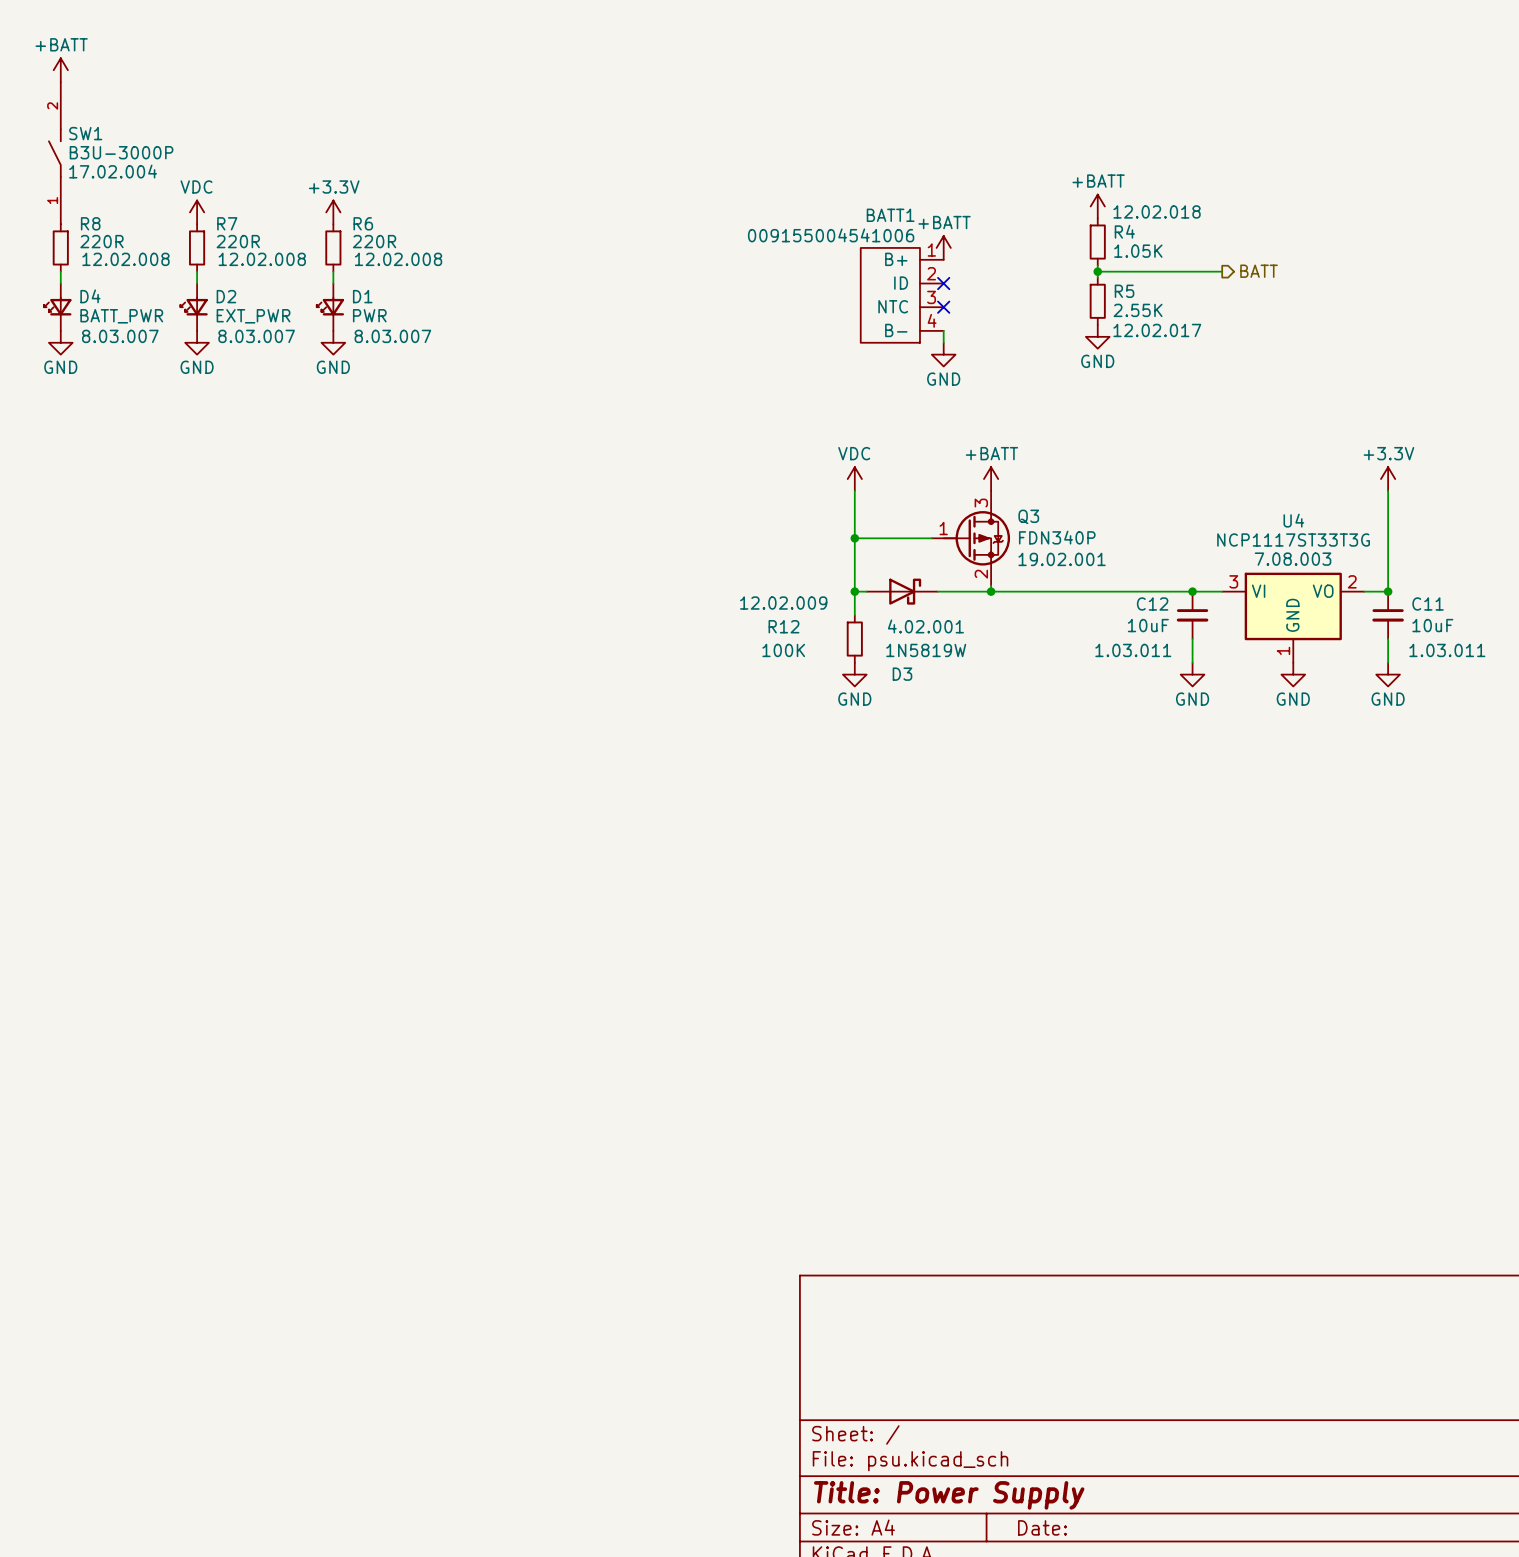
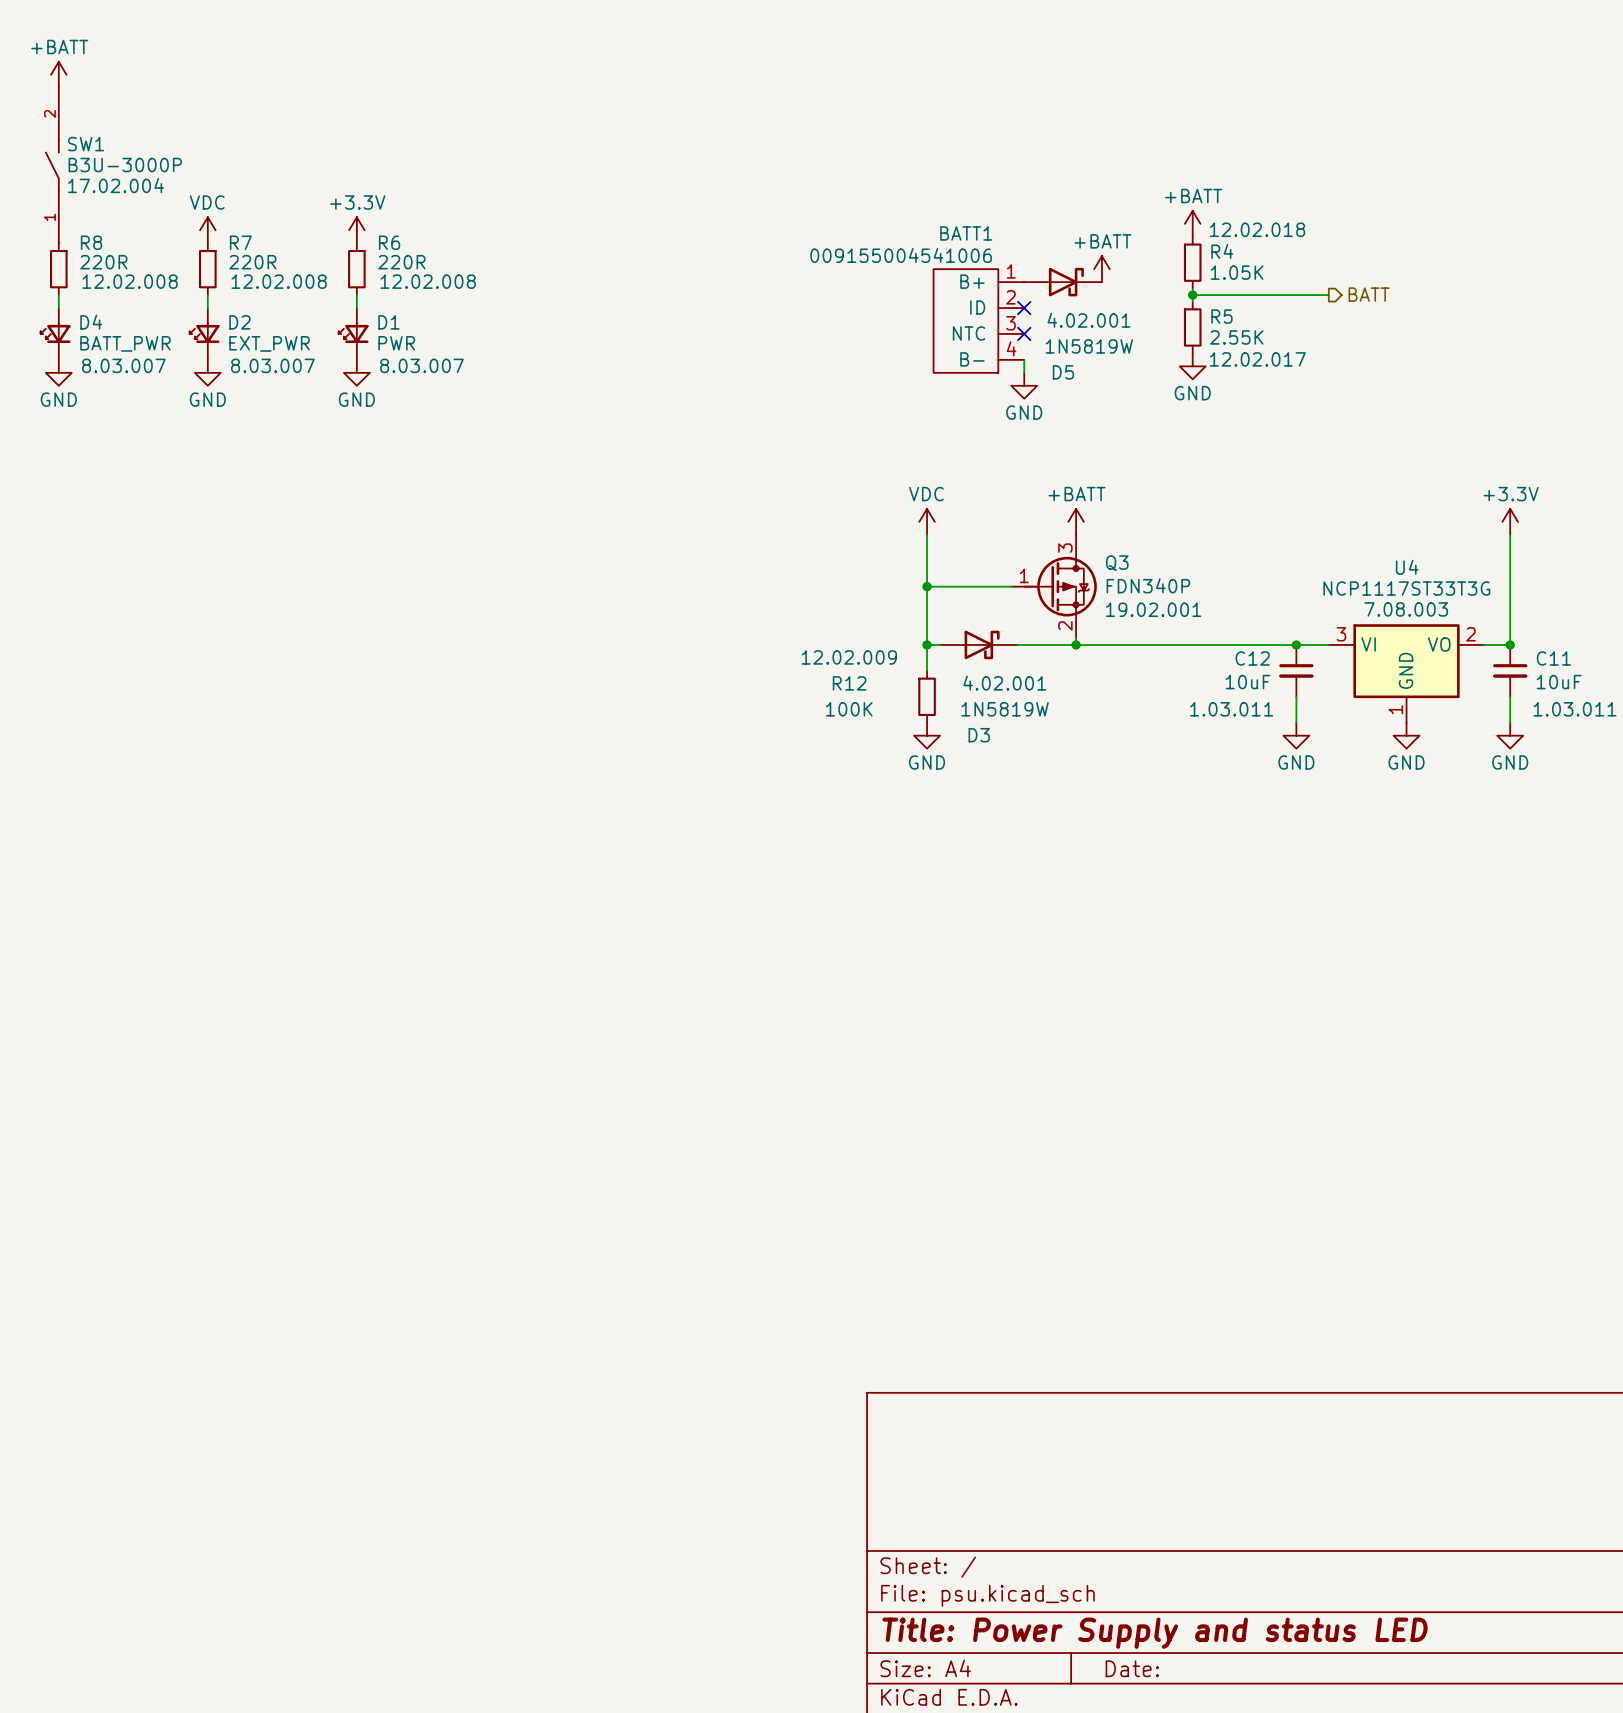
power symbol position: +BATT (943, 247) -> +BATT (1101, 269)
D5: none -> 1N5819W (1063, 282)
title block: Title: Power Supply (949, 1495) -> Title: Power Supply and status LED (1155, 1633)

